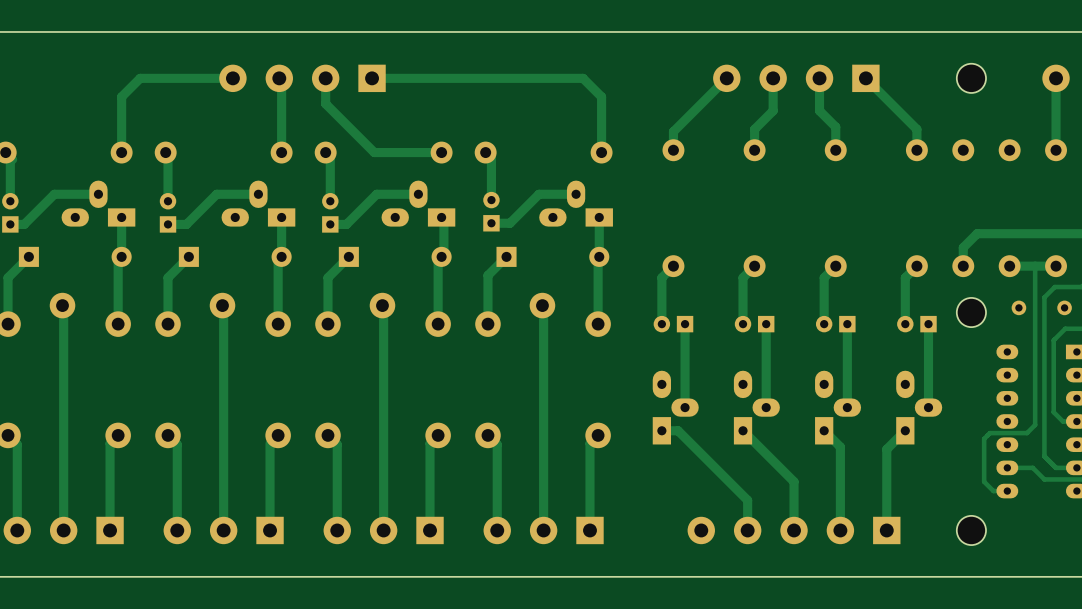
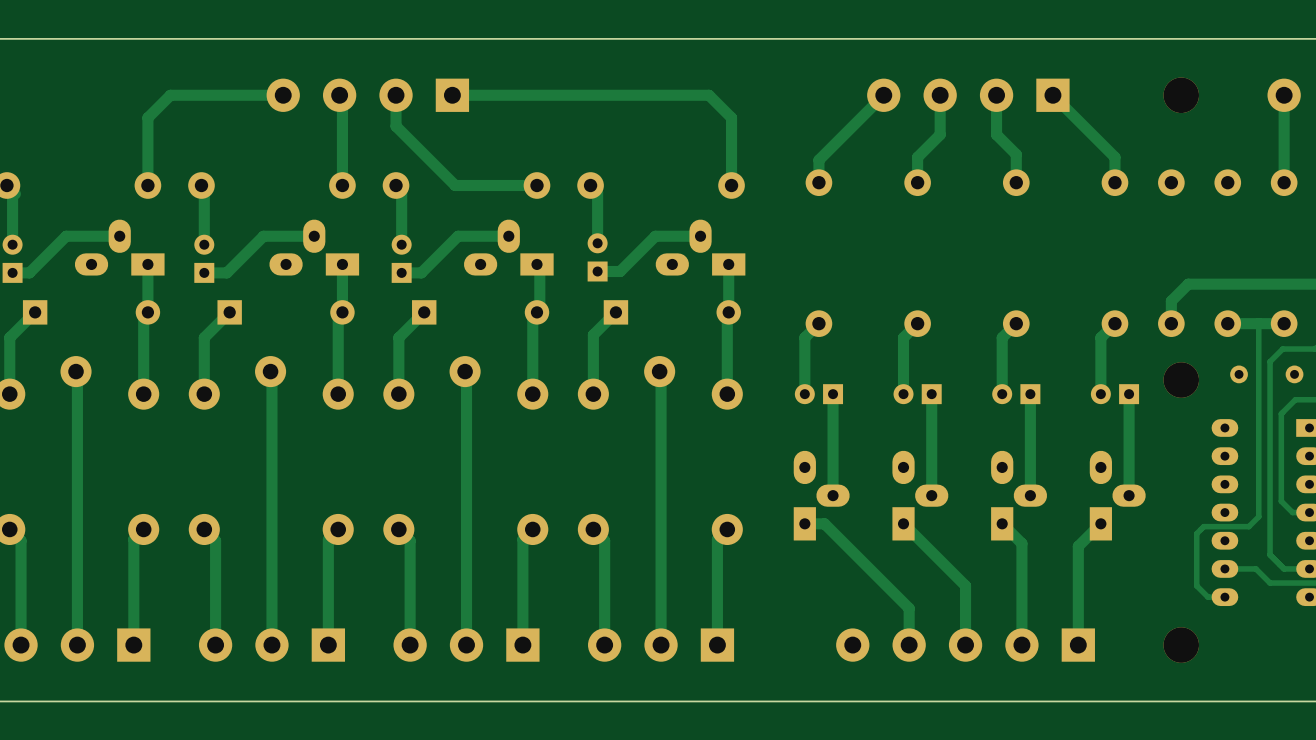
part footprint: [956, 63, 987, 93] -> [1163, 77, 1199, 114]
part footprint: [956, 297, 987, 328] -> [1163, 362, 1199, 398]
part footprint: [956, 515, 987, 546] -> [1163, 627, 1199, 663]

